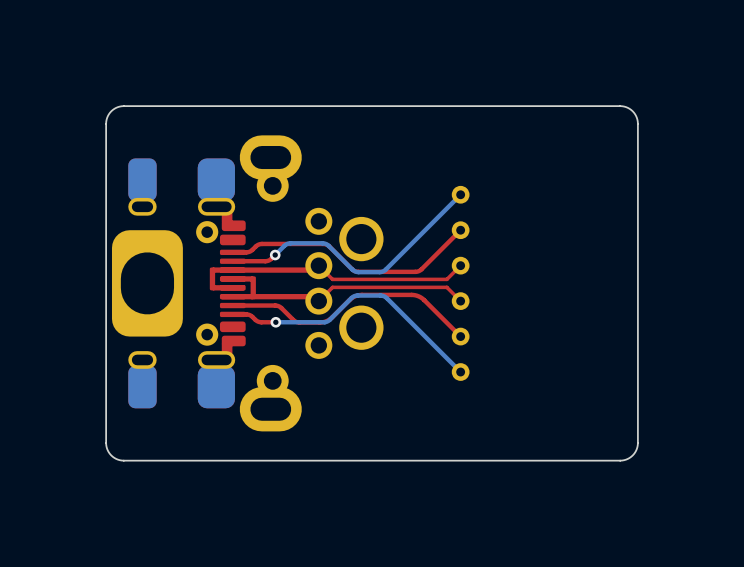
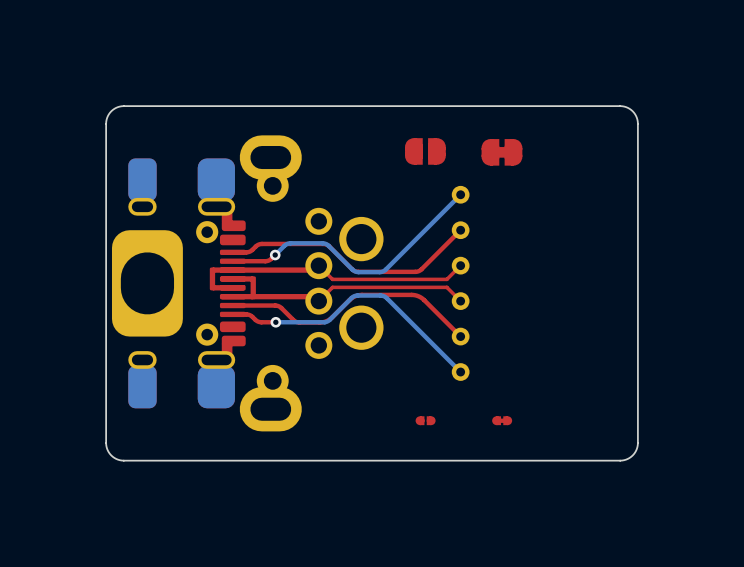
part: none -> (425, 151)
part: none -> (501, 152)
part: none -> (425, 420)
part: none -> (502, 420)

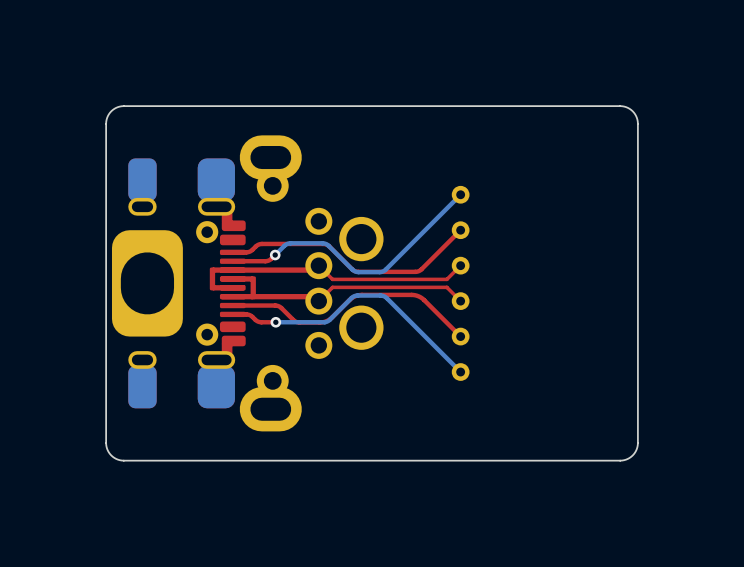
part: (425, 151) -> none
part: (501, 152) -> none
part: (425, 420) -> none
part: (502, 420) -> none

